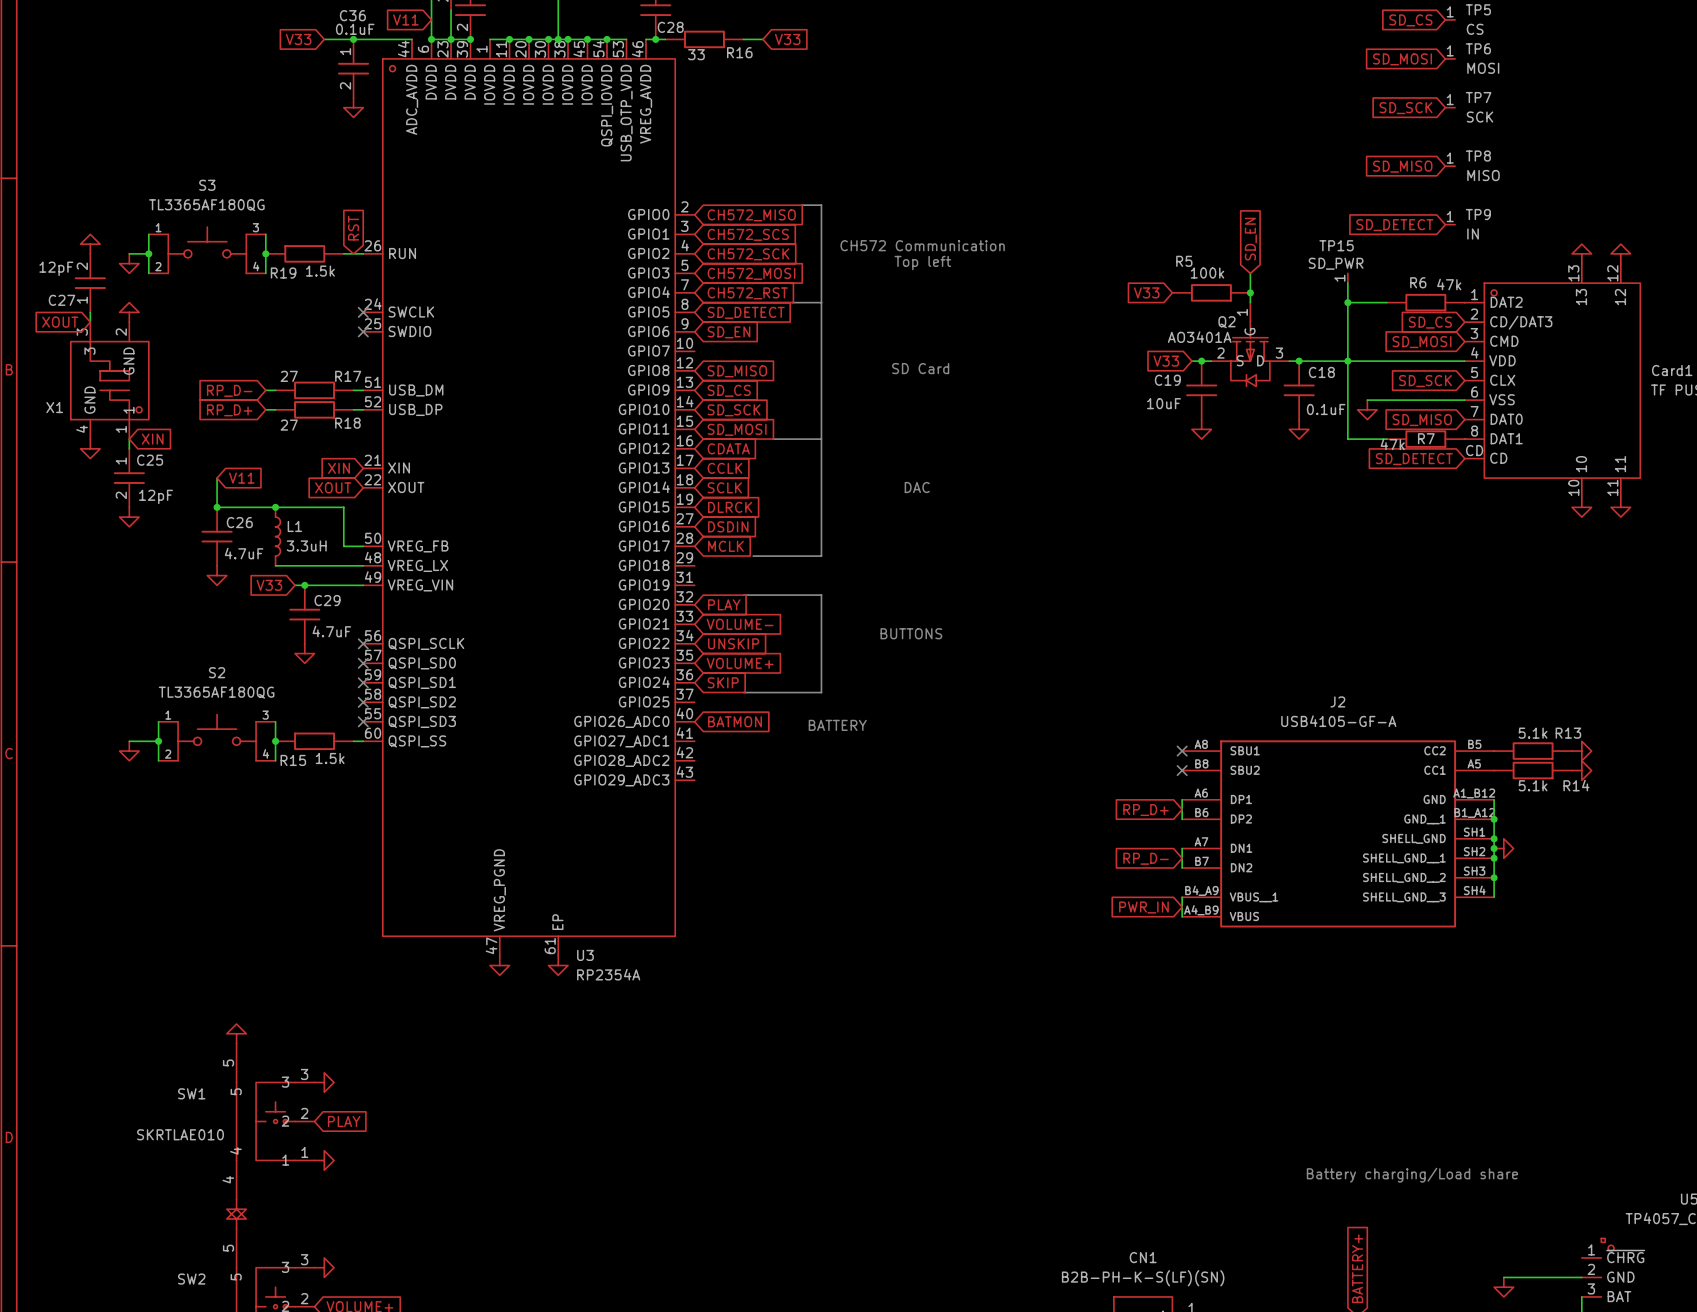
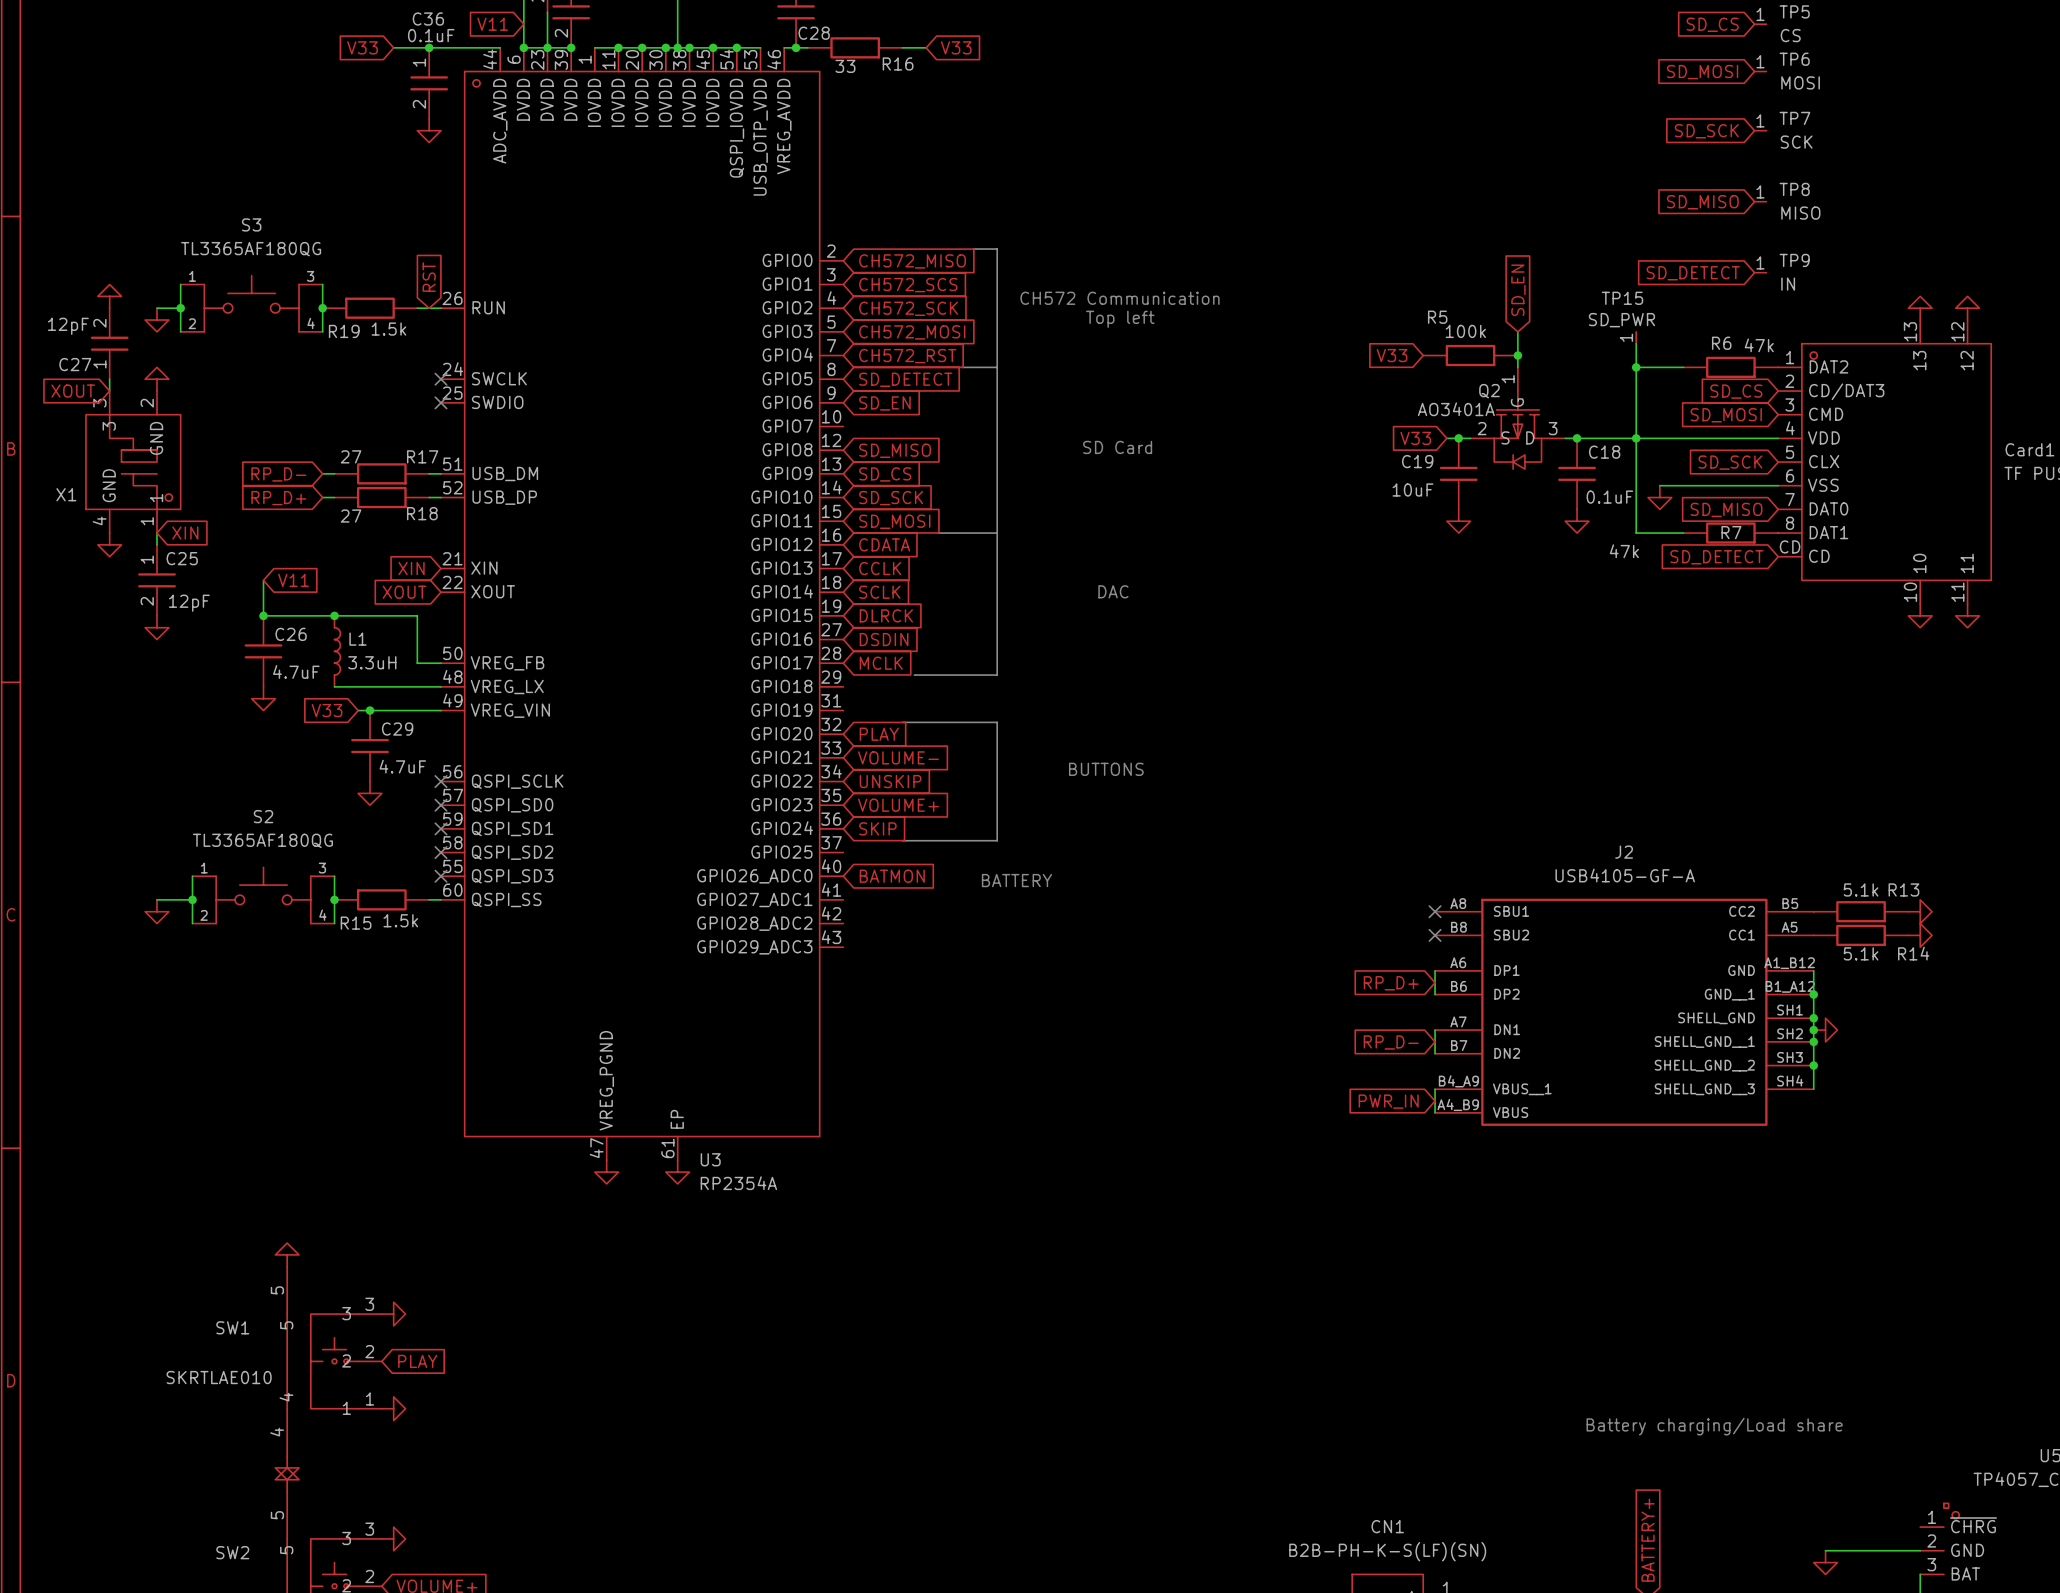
R7 value position: 47k (1392, 444) -> 47k (1624, 551)

